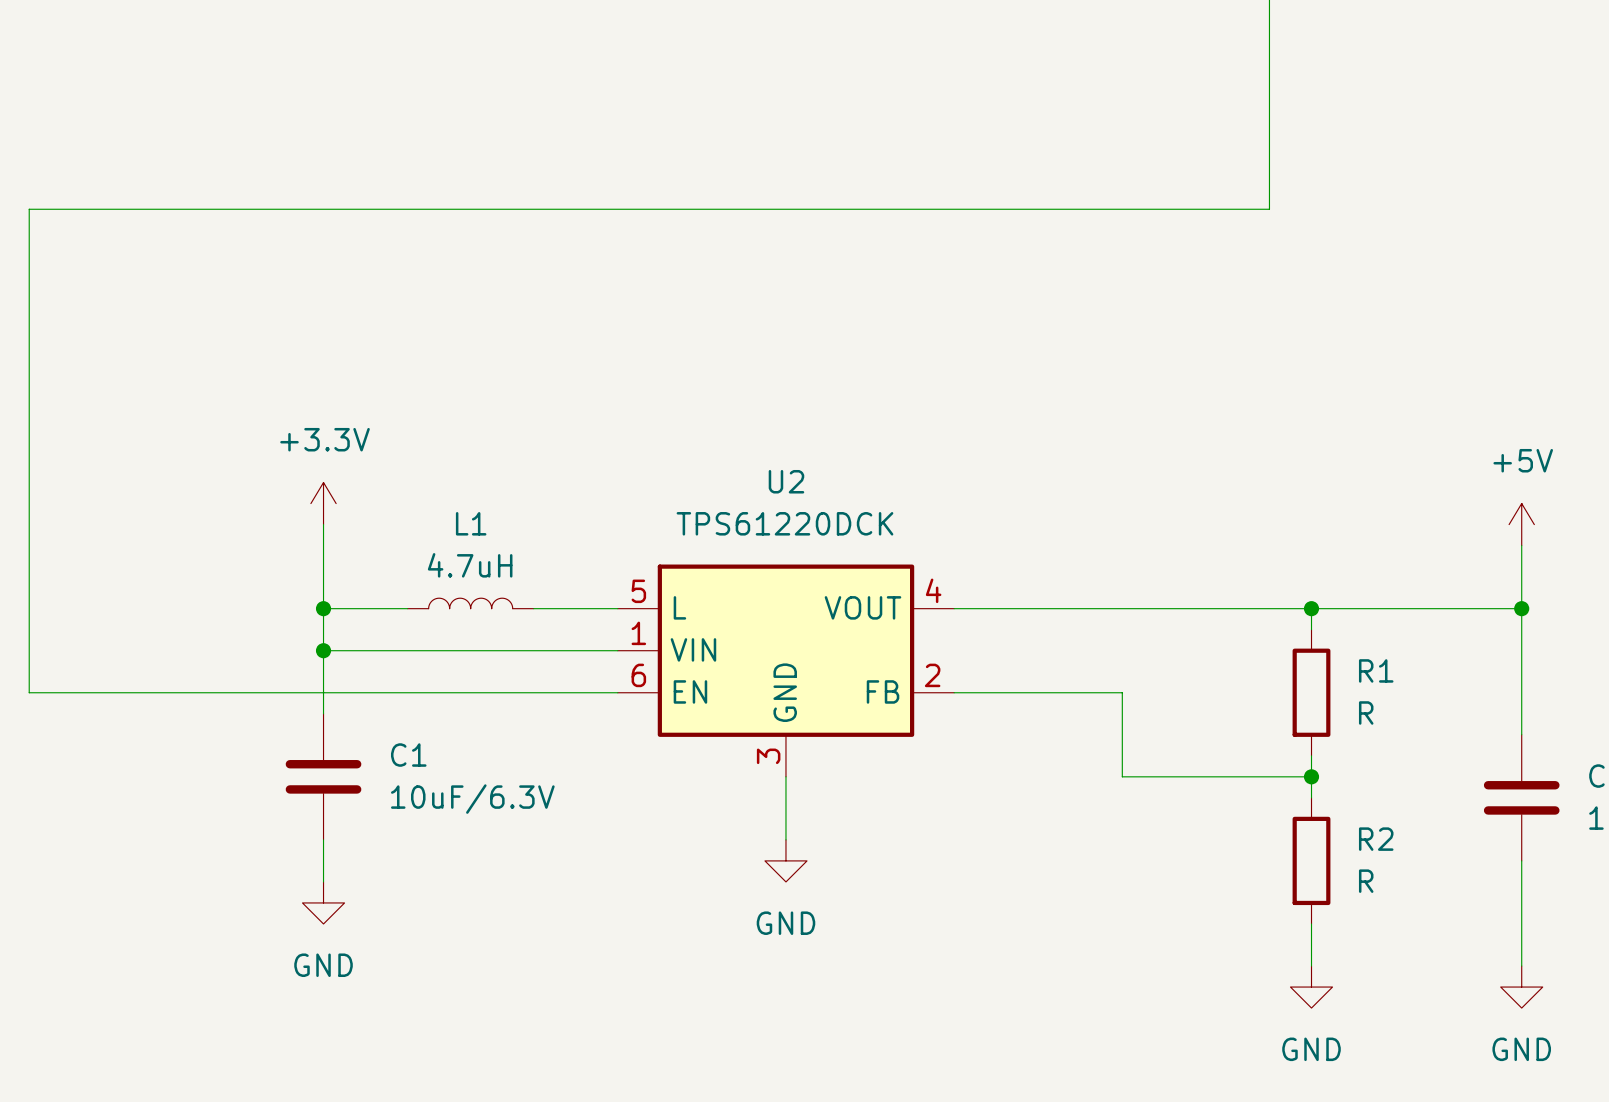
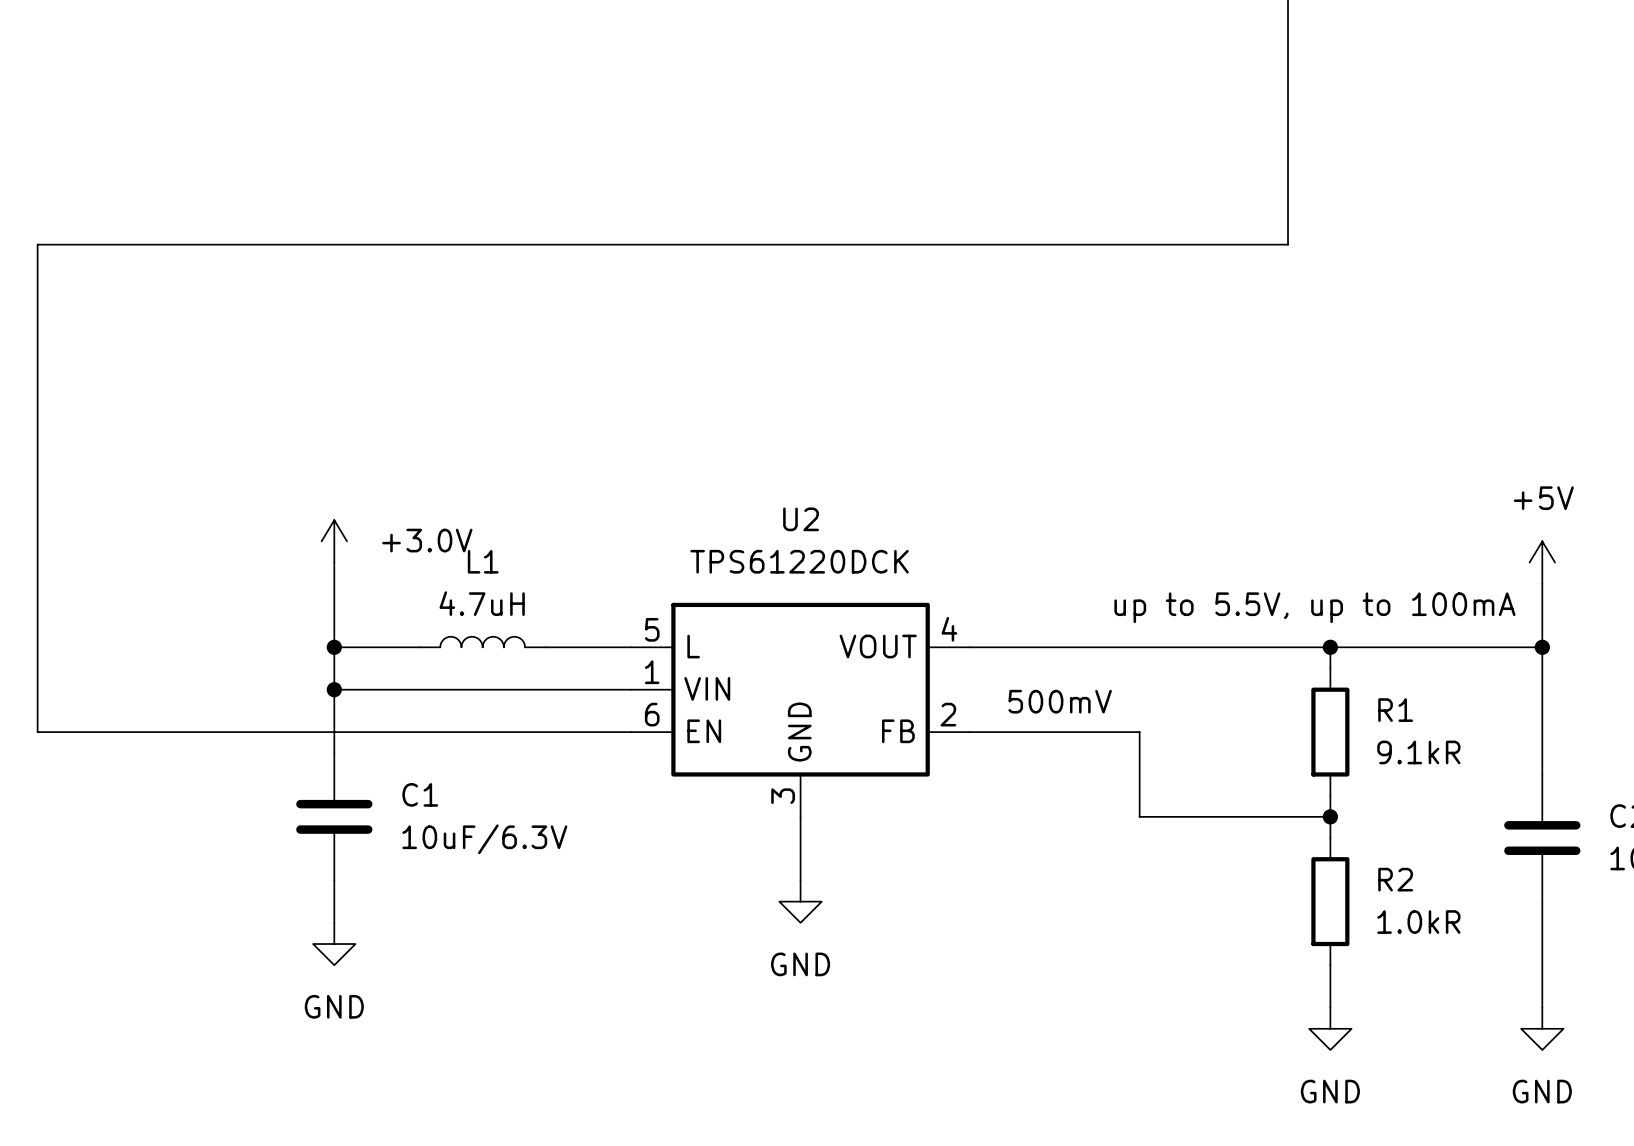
power symbol: +3.3V (323, 503) -> +3.0V (334, 541)
text: none -> up to 5.5V, up to 100mA (1314, 607)
text: none -> 500mV (1060, 701)
R1 value: R (1366, 712) -> 9.1kR (1418, 752)
R2 value: R (1366, 881) -> 1.0kR (1418, 922)

